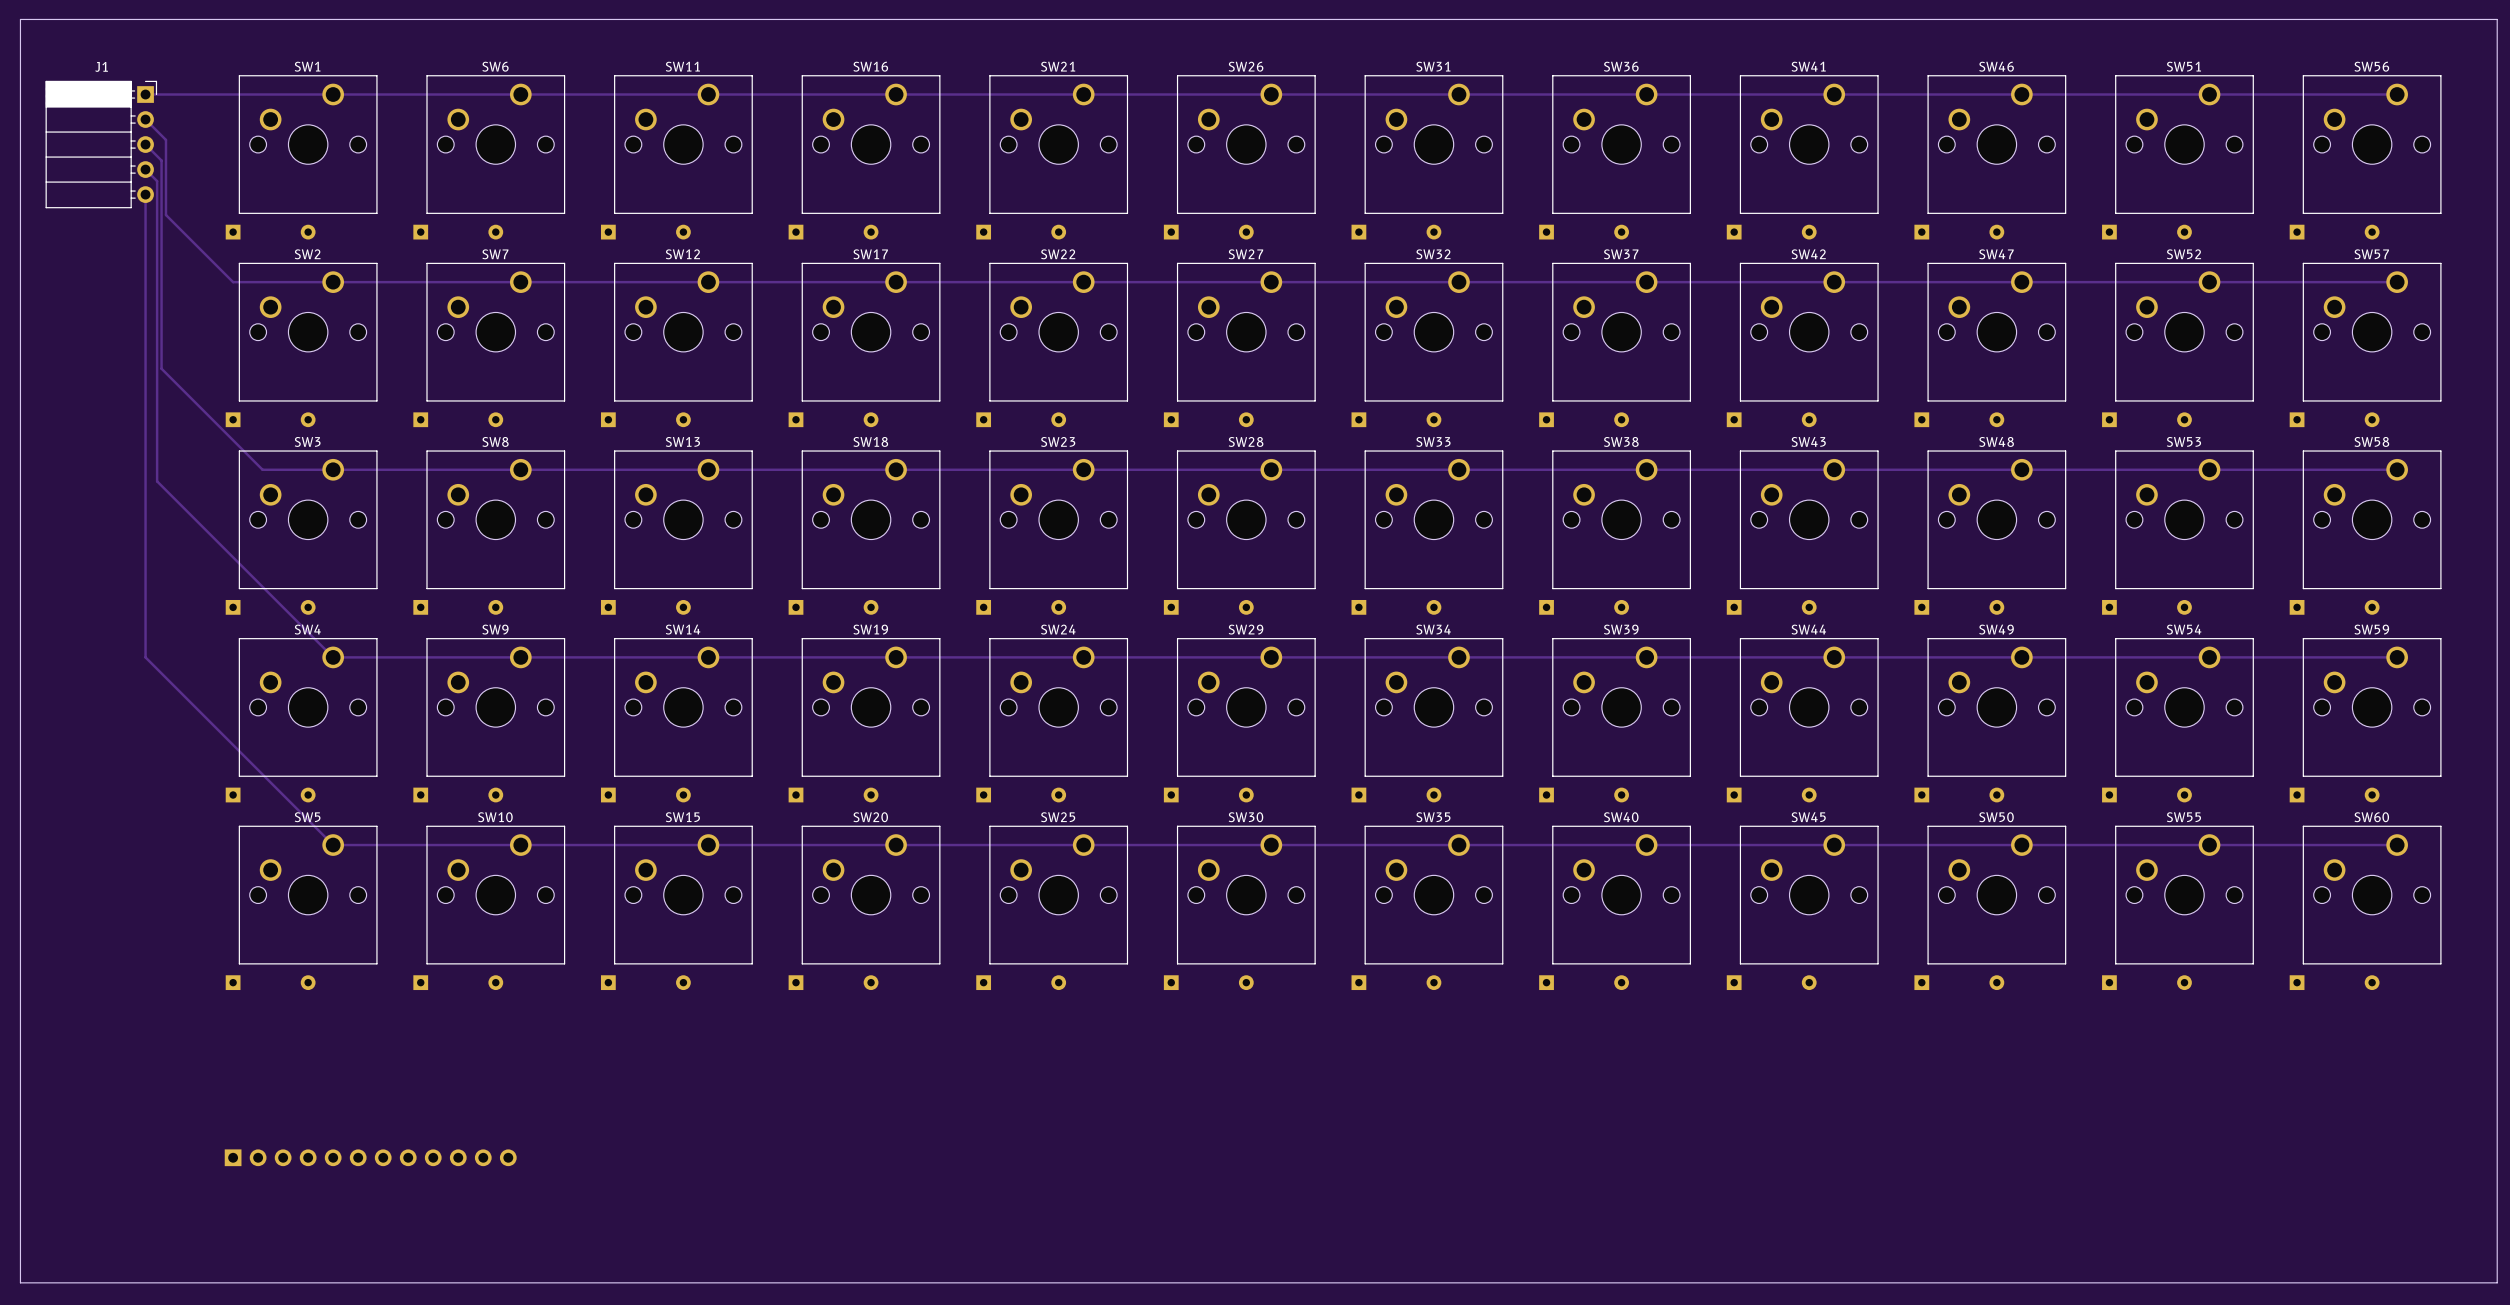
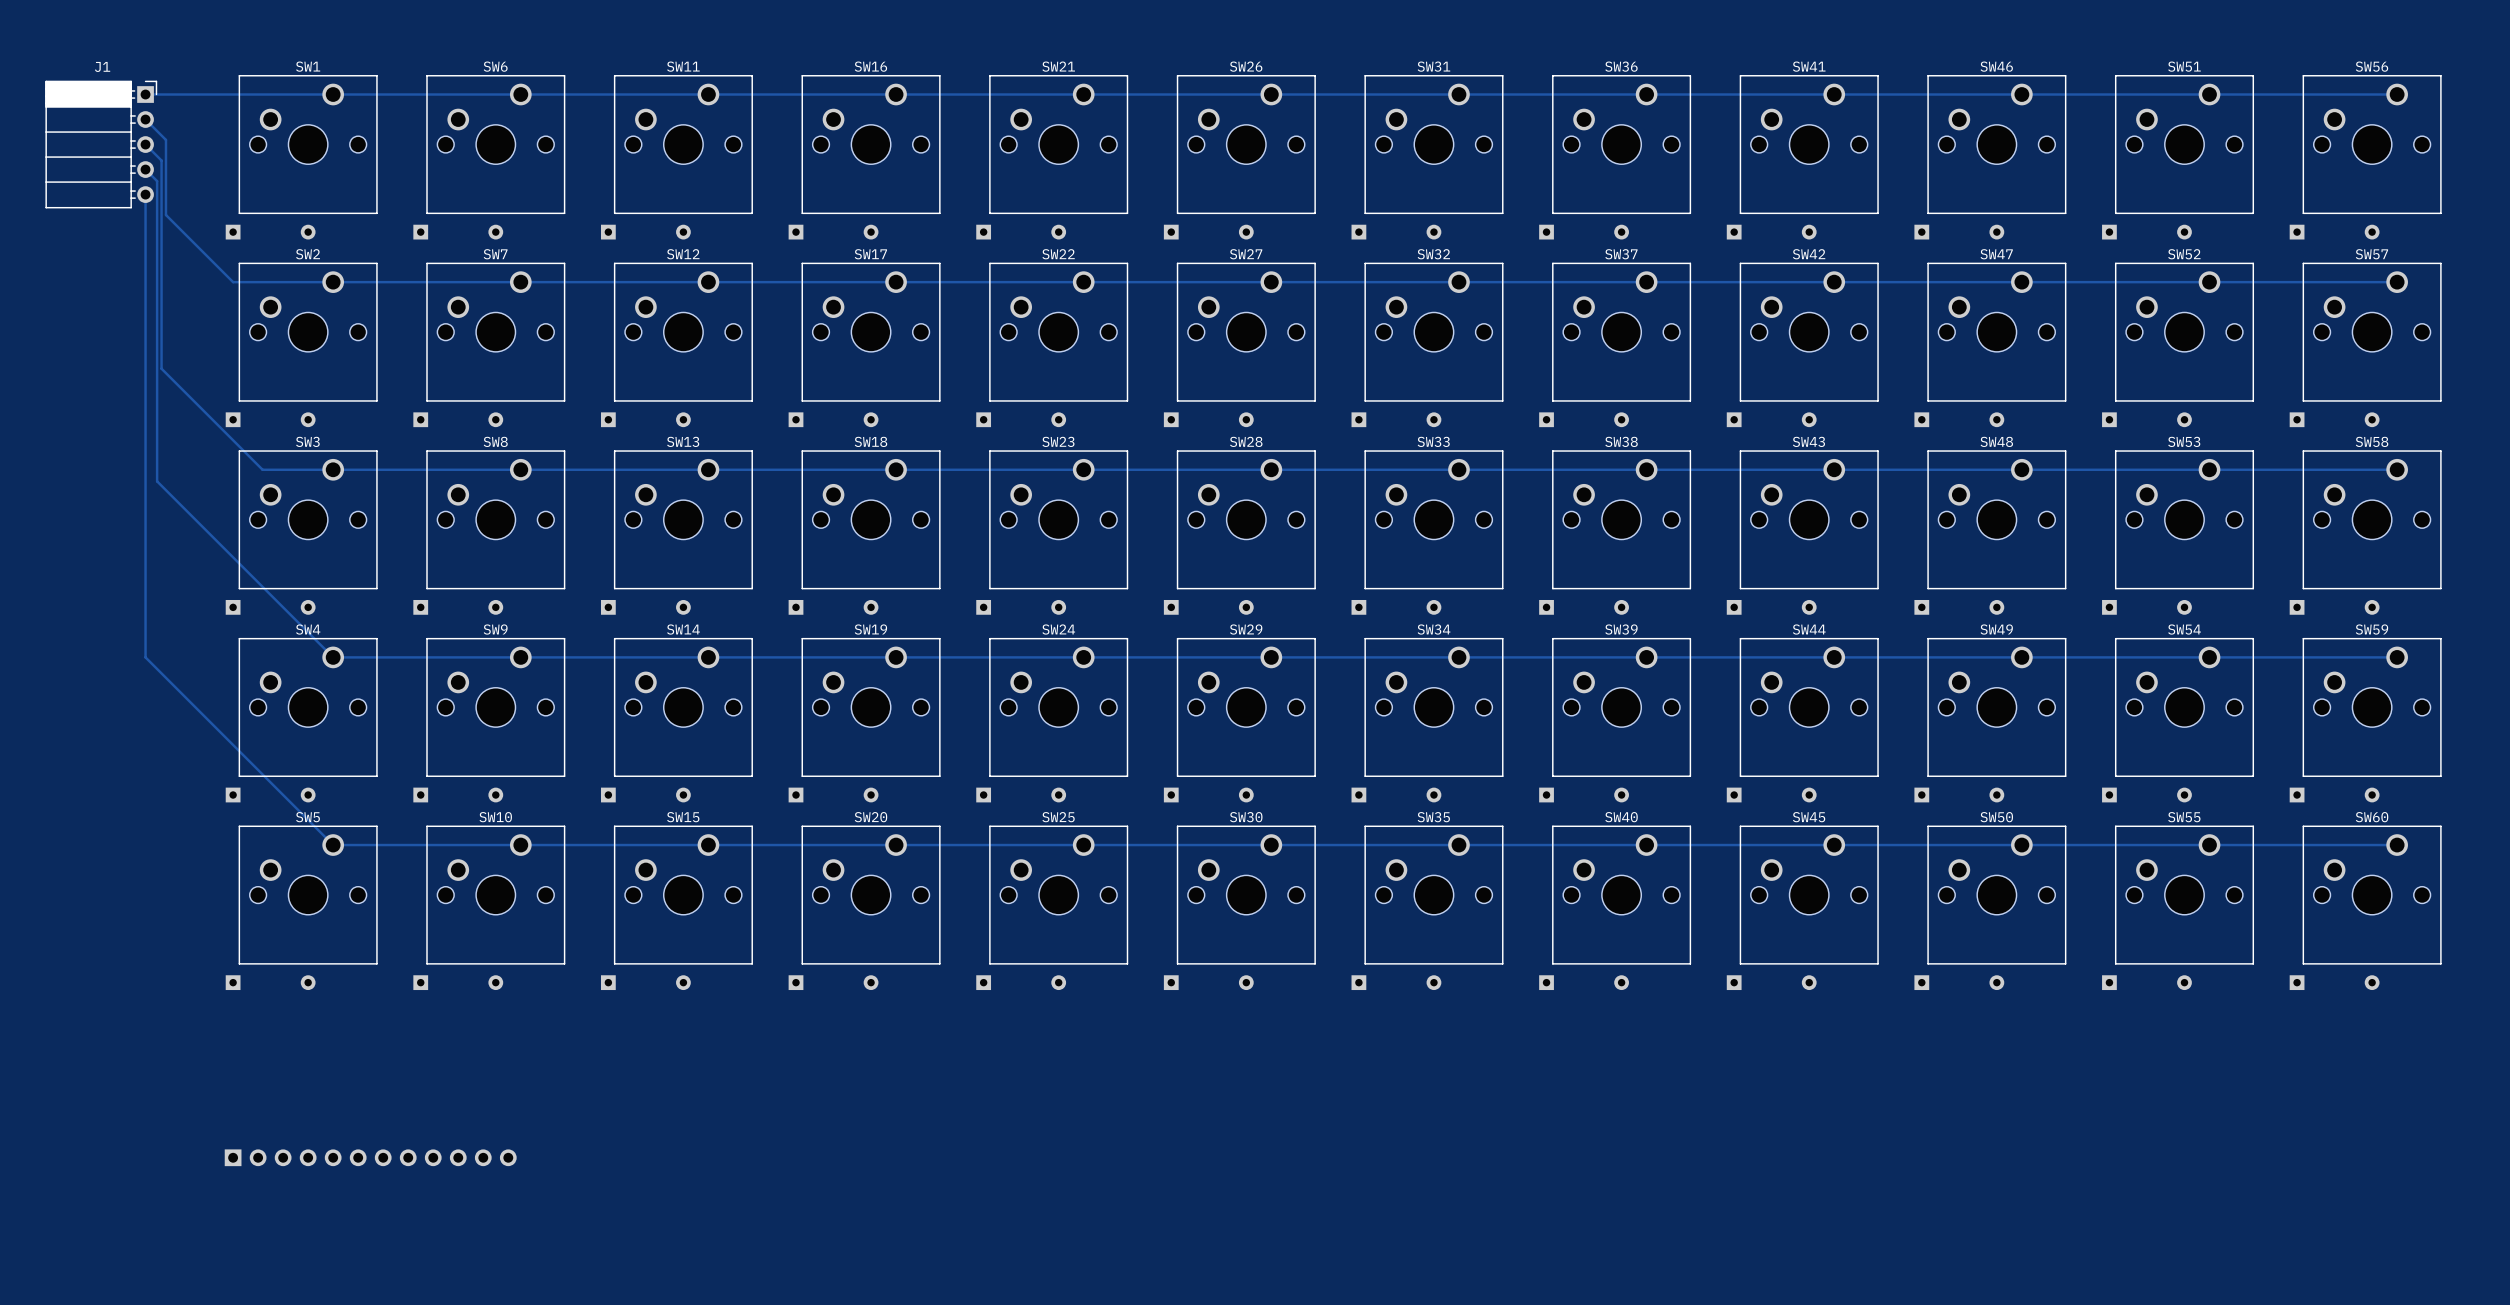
board edge: (20, 19) (20, 1282) (2497, 1282) (2497, 19) (20, 19) -> none

